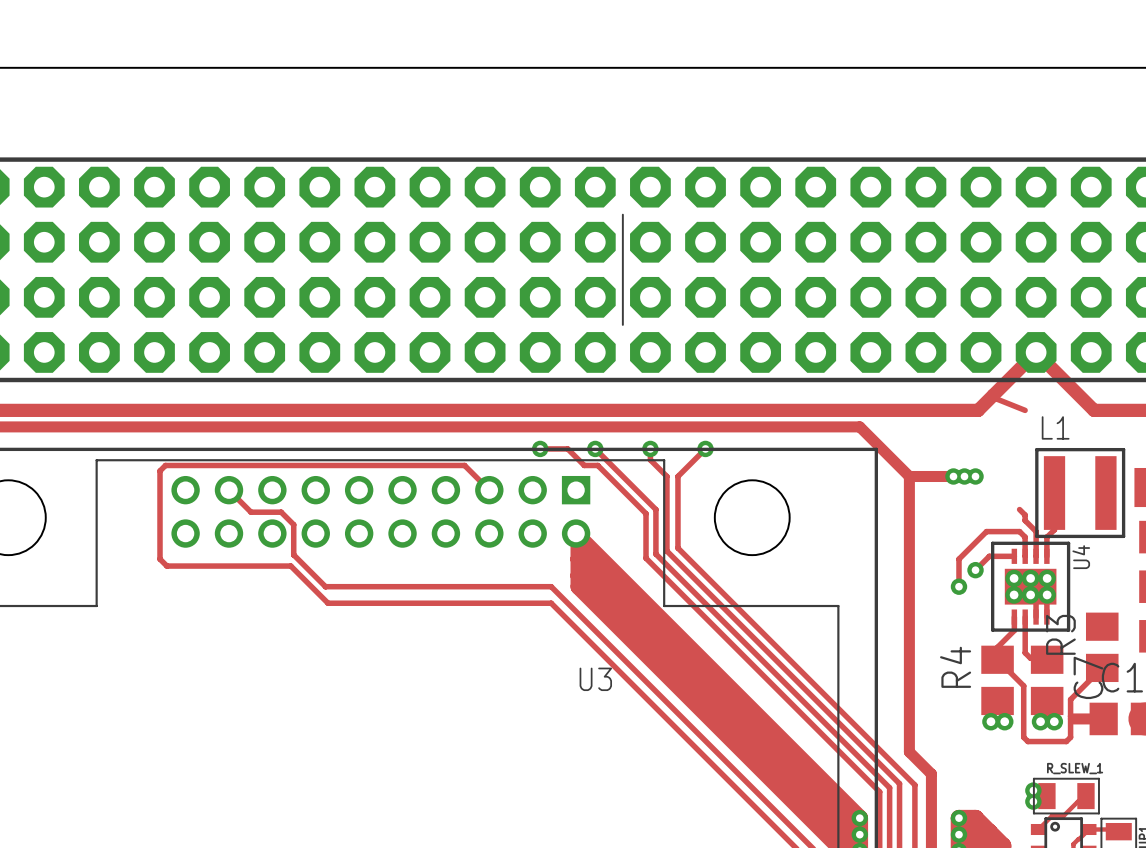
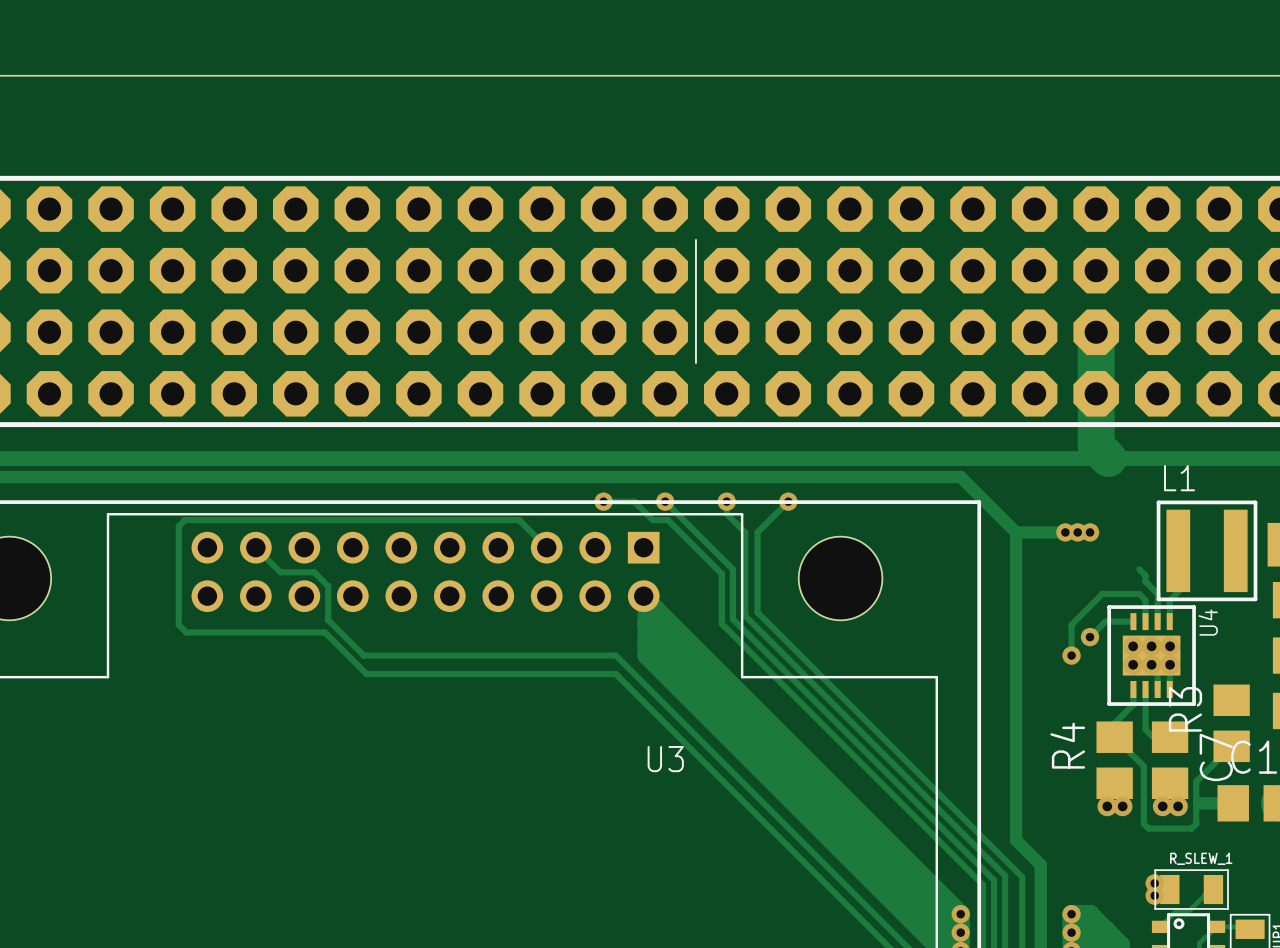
track: (993, 395) (997, 399) (1025, 410) -> none
track: (981, 407) (1036, 352) (1094, 410) -> (1096, 332) (1096, 446) (1108, 458) (1222, 458)

